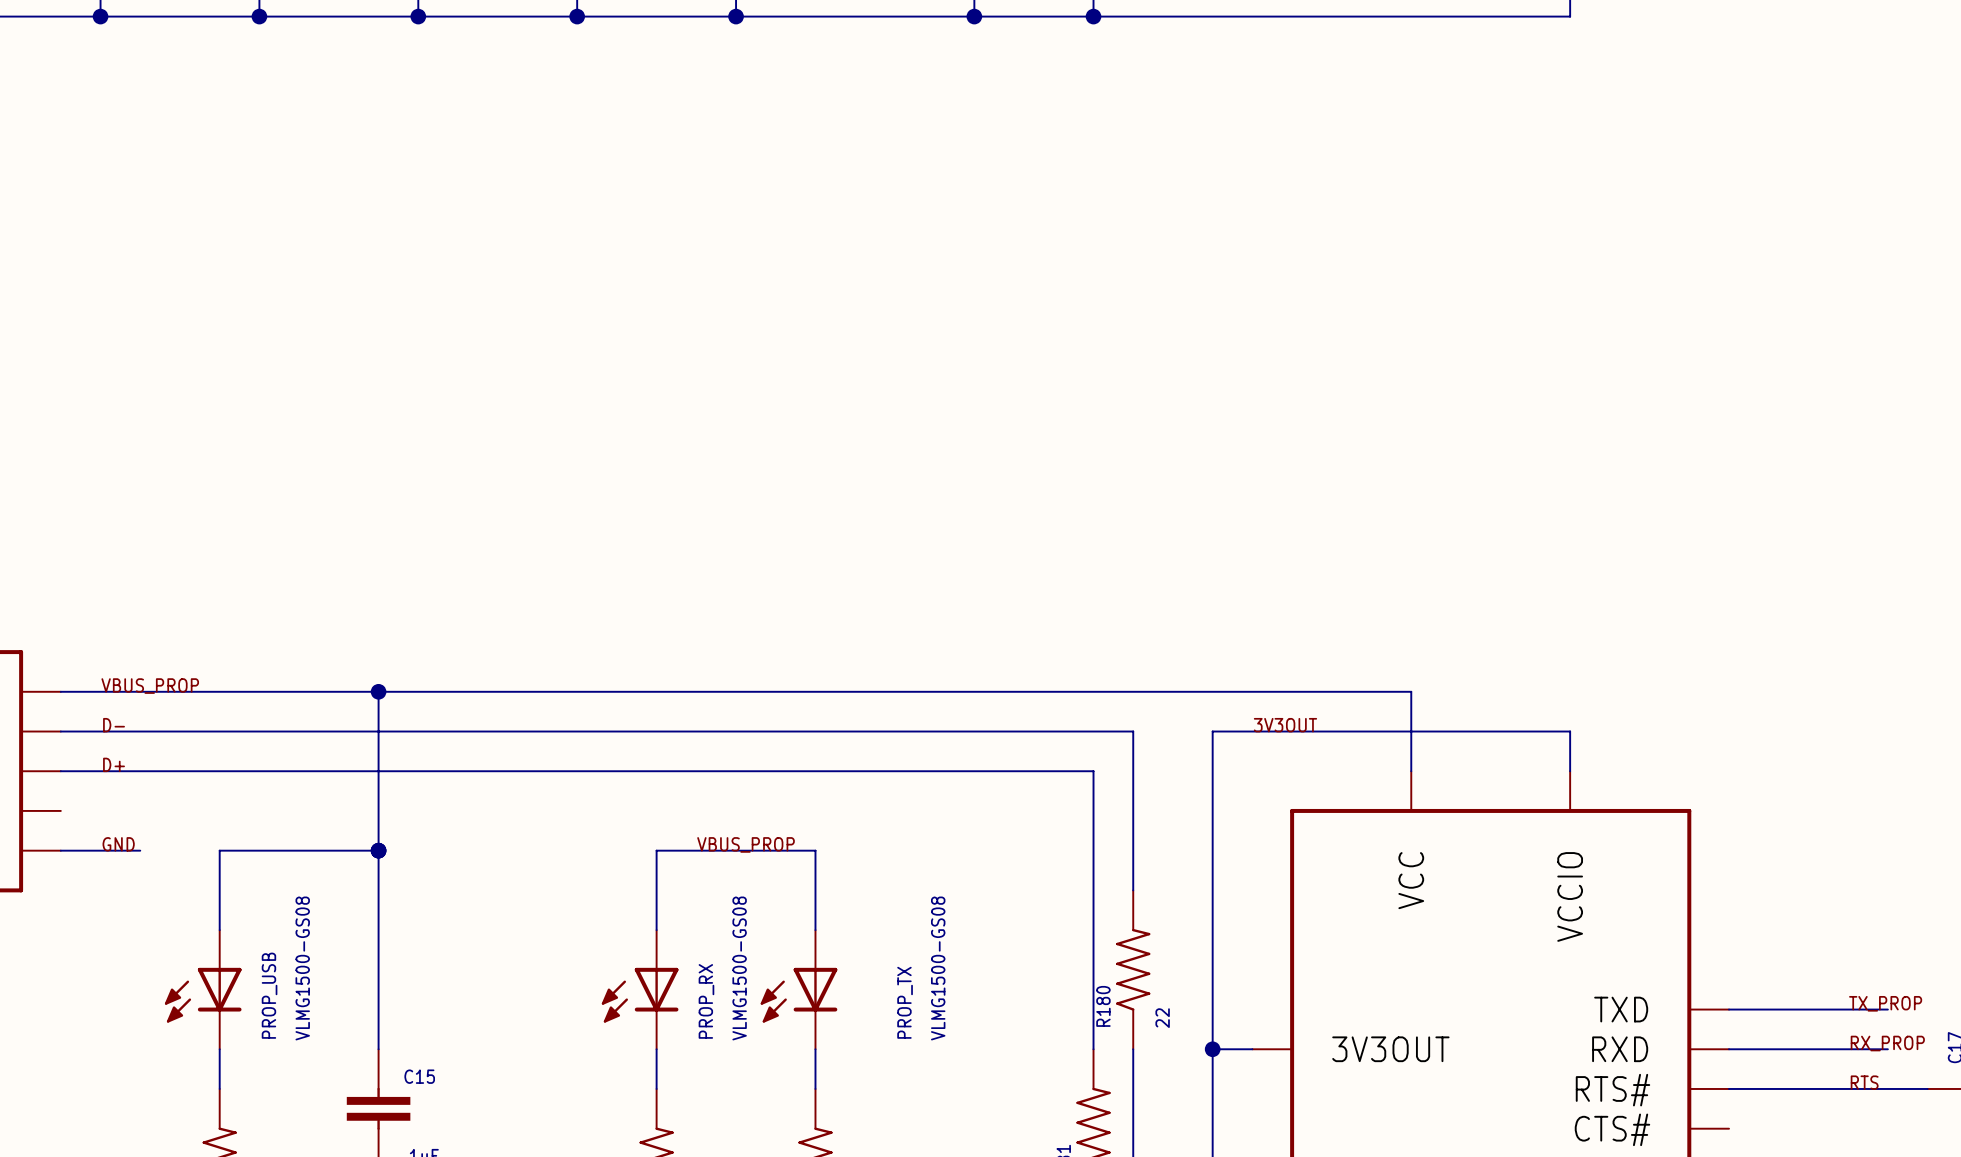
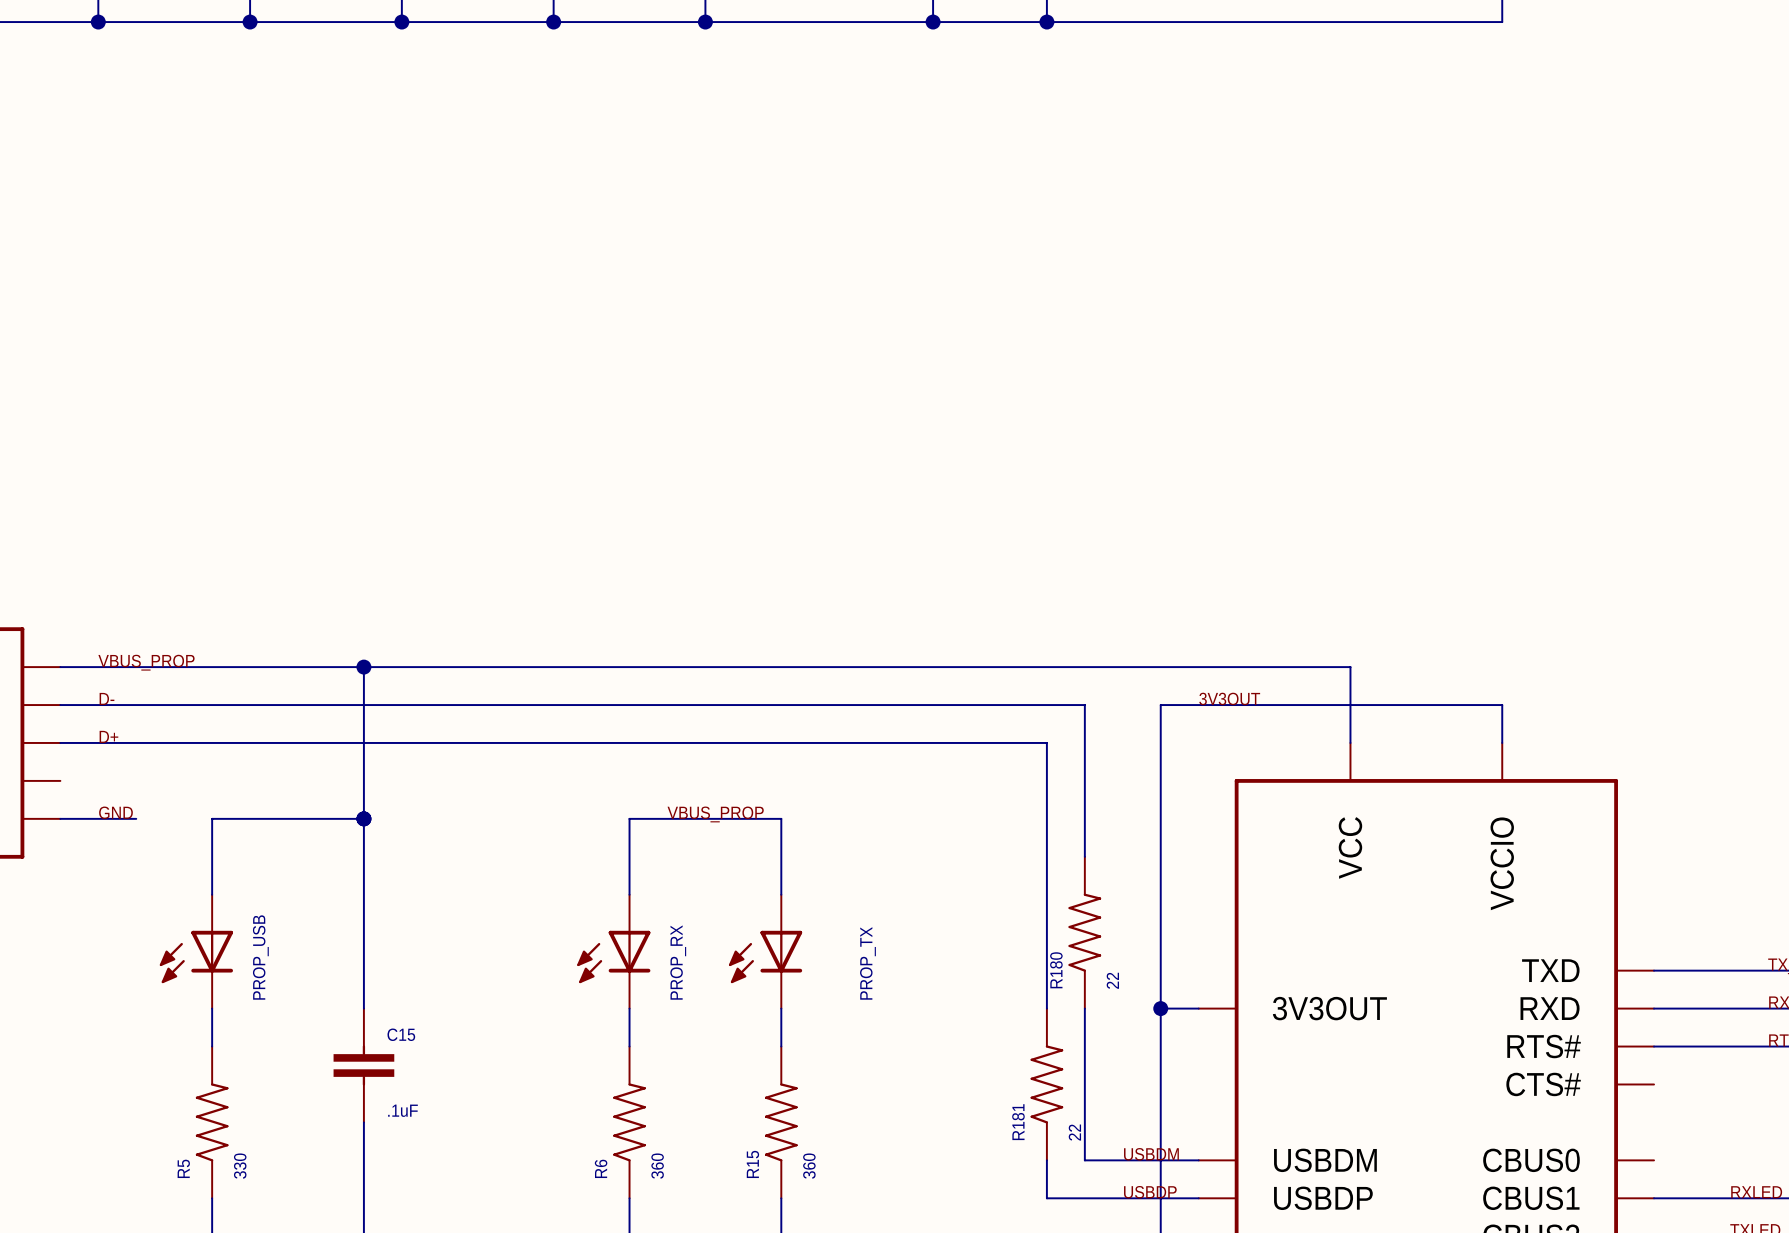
PROP_USB value: VLMG1500-GS08 (302, 968) -> none
PROP_RX value: VLMG1500-GS08 (739, 968) -> none
PROP_TX value: VLMG1500-GS08 (938, 968) -> none

